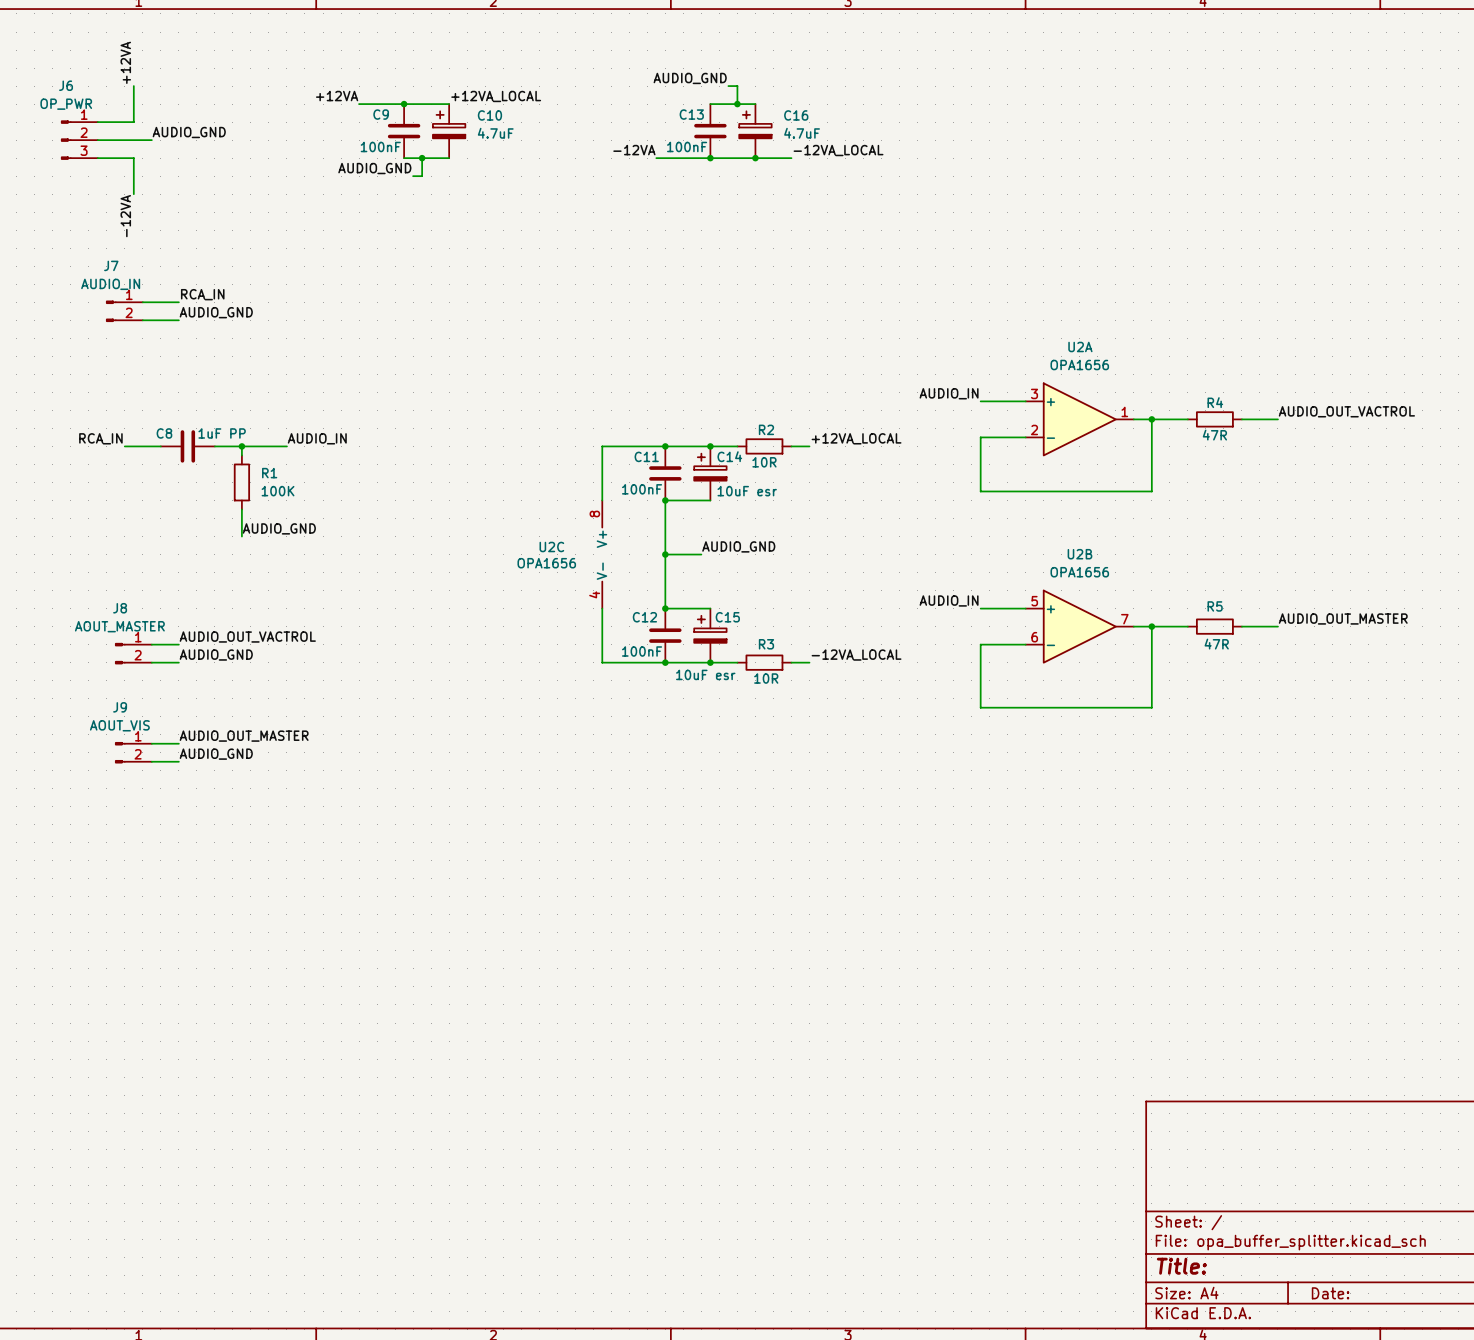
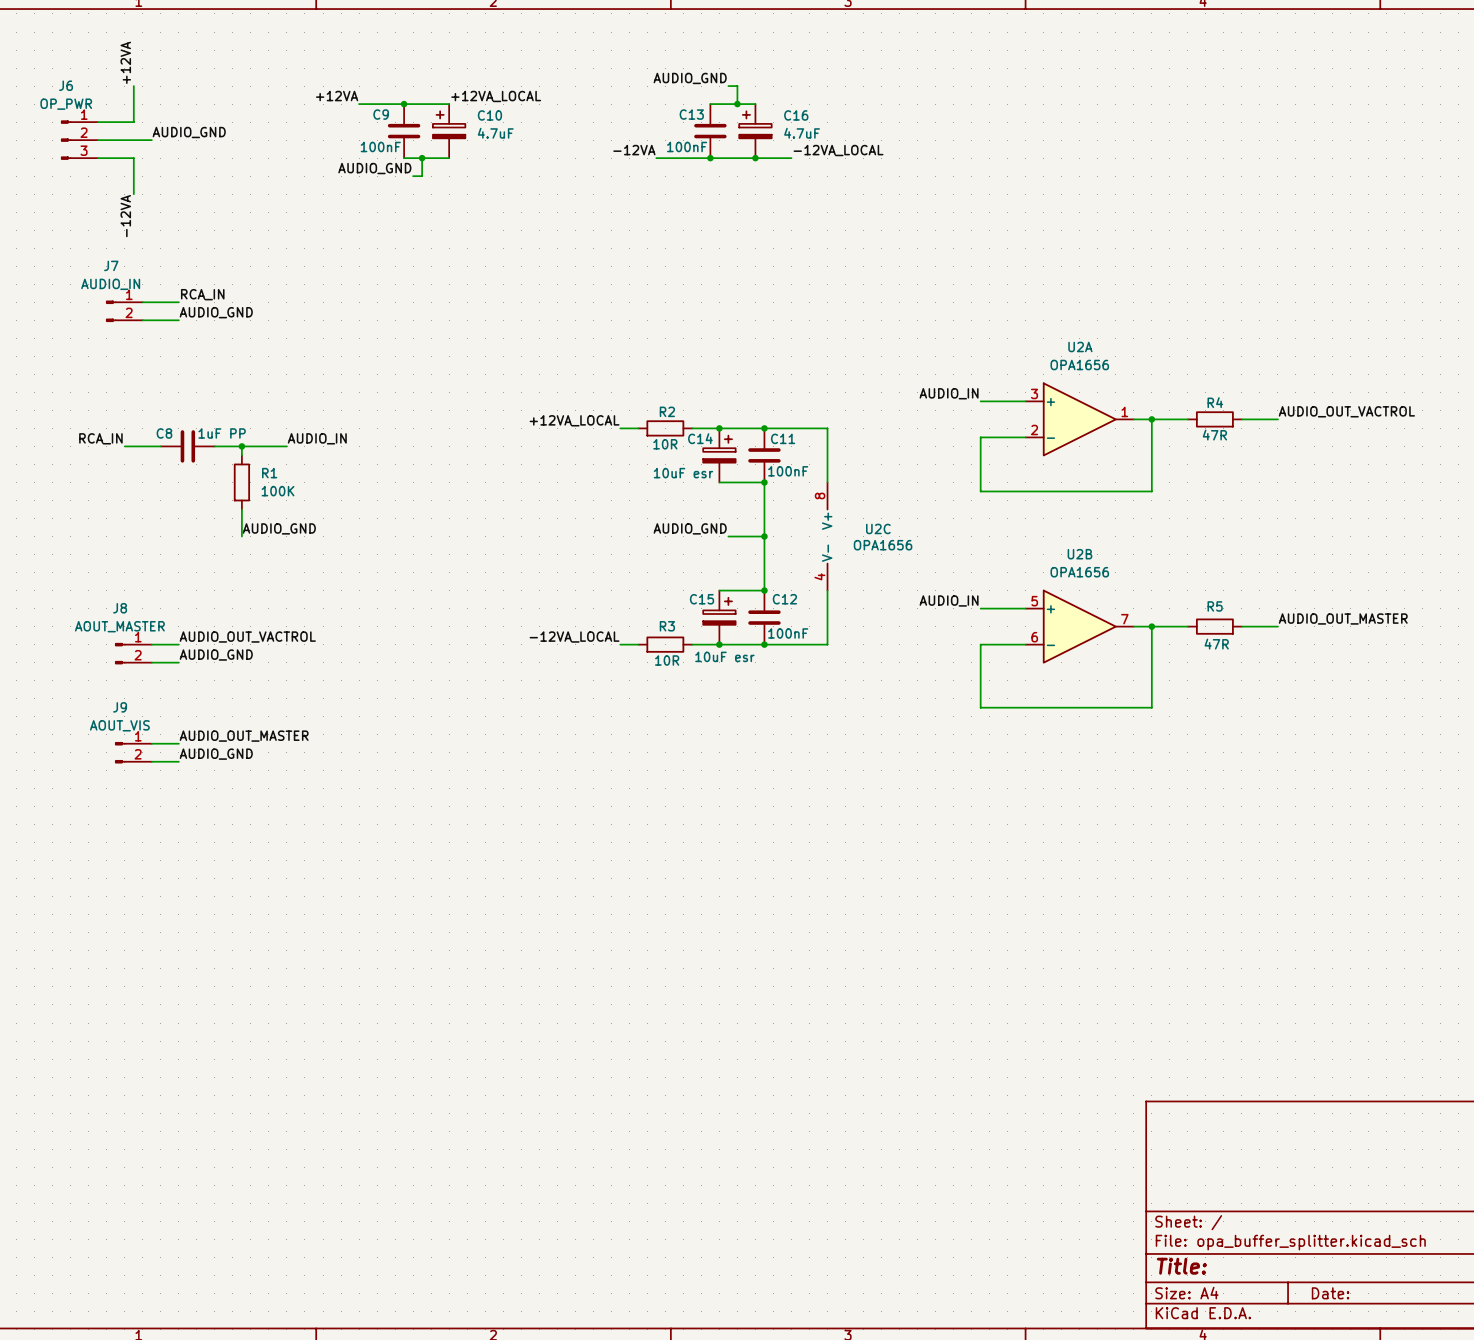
label: none -> +12VA_LOCAL (574, 420)
wire: none -> (692, 428) (827, 428) (827, 482)
junction: none -> (764, 428)
label: +12VA_LOCAL (856, 438) -> none
junction: (665, 446) -> none
junction position: (710, 446) -> (719, 428)
wire: (737, 446) (602, 446) (602, 500) -> none
R2 position: (764, 446) -> (665, 428)
wire: (791, 446) (809, 446) -> (620, 428) (638, 428)
C11 name position: C11 (646, 456) -> C11 (783, 438)
C14 flip: as is (710, 467) -> left-right (719, 449)
C11 position: (665, 473) -> (764, 455)
wire: none -> (719, 482) (764, 482) (764, 590) (719, 590)
junction: none -> (764, 482)
C11 value position: 100nF (642, 489) -> 100nF (788, 471)
junction: (665, 500) -> none
wire: (710, 500) (665, 500) (665, 608) (710, 608) -> none
junction: none -> (764, 536)
U2C name position: U2C (551, 546) -> U2C (878, 528)
label position: AUDIO_GND (738, 546) -> AUDIO_GND (690, 528)
U2C position: (602, 554) -> (827, 536)
wire: (665, 554) (701, 554) -> (728, 536) (764, 536)
junction: (665, 554) -> none
U2C value position: OPA1656 (546, 563) -> OPA1656 (883, 545)
junction: none -> (764, 590)
wire: none -> (827, 590) (827, 644) (692, 644)
wire: (602, 608) (602, 662) (737, 662) -> none
junction: (665, 608) -> none
C12 name position: C12 (644, 617) -> C12 (784, 599)
C15 flip: as is (710, 629) -> left-right (719, 611)
C12 position: (665, 635) -> (764, 617)
label: none -> -12VA_LOCAL (574, 637)
junction: none -> (764, 644)
C12 value position: 100nF (642, 651) -> 100nF (788, 633)
label: -12VA_LOCAL (856, 655) -> none
junction: (665, 662) -> none
junction position: (710, 662) -> (719, 644)
R3 position: (764, 662) -> (665, 644)
wire: (791, 662) (809, 662) -> (620, 644) (638, 644)

